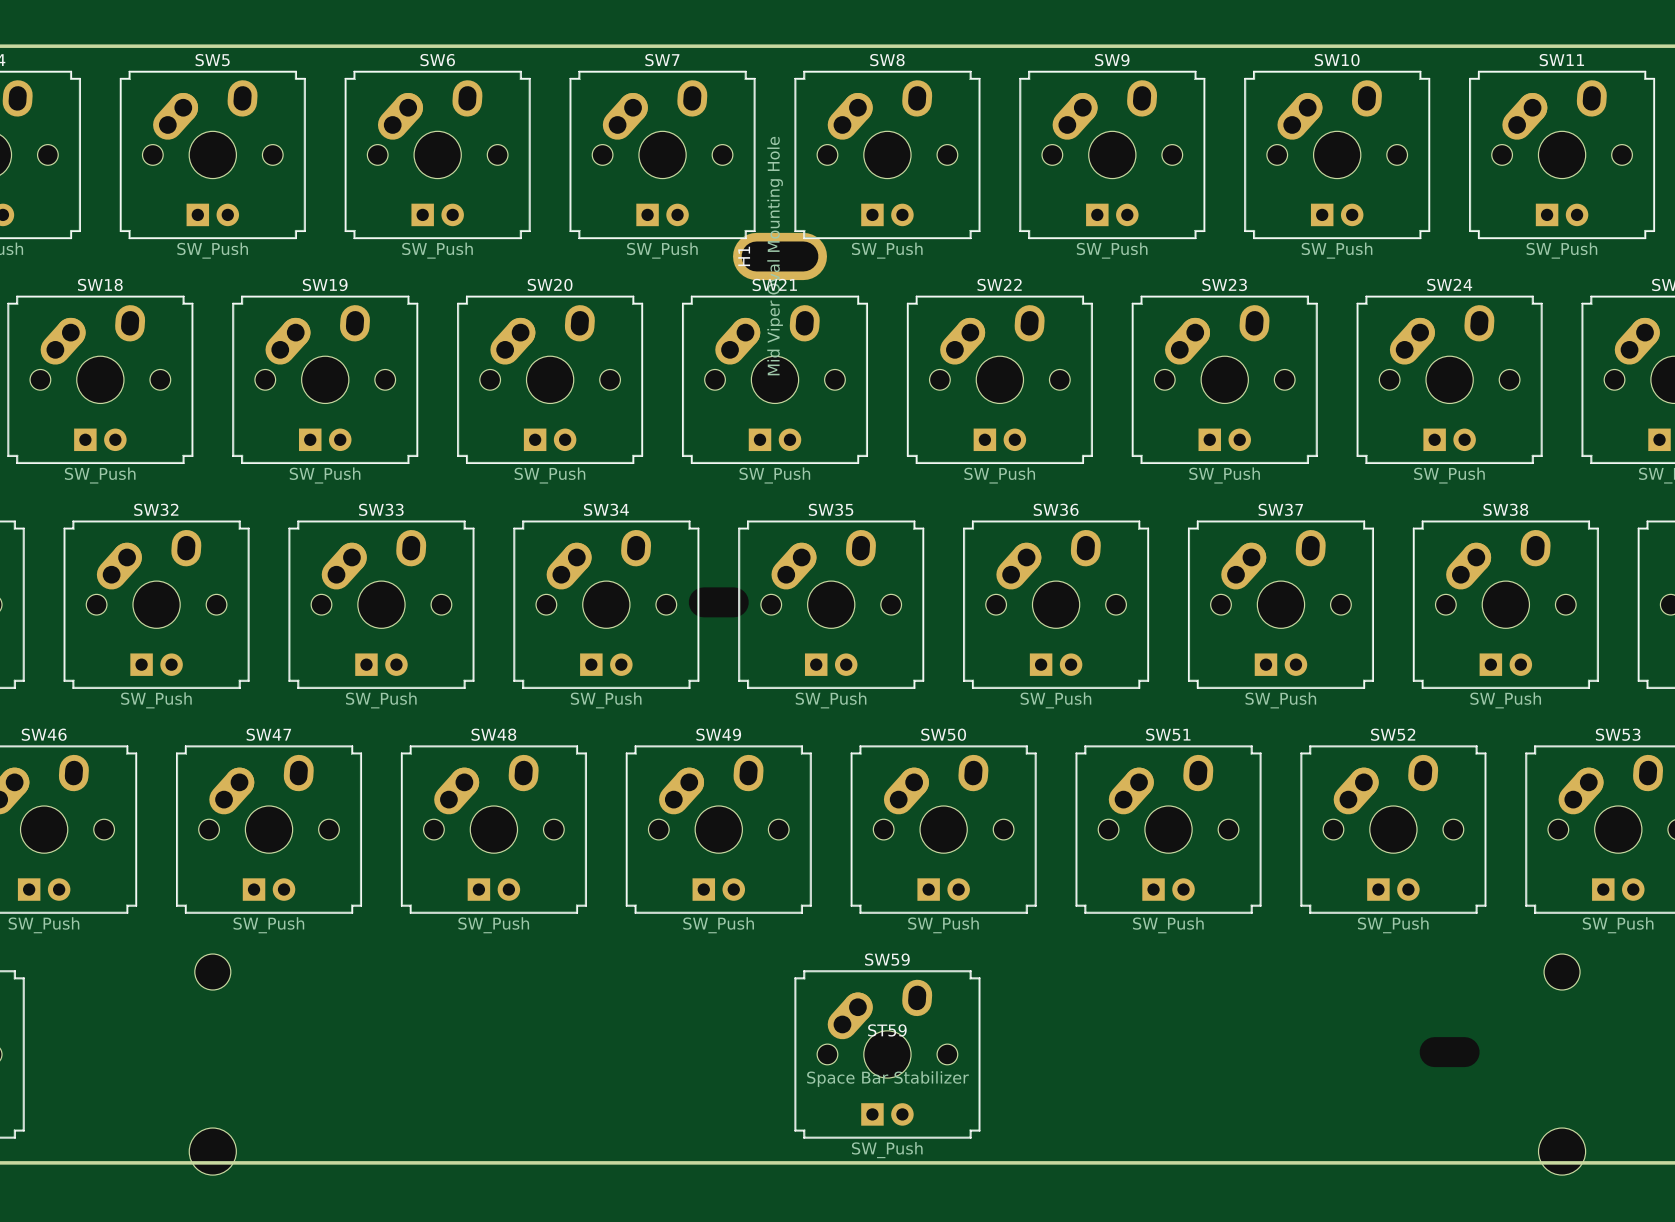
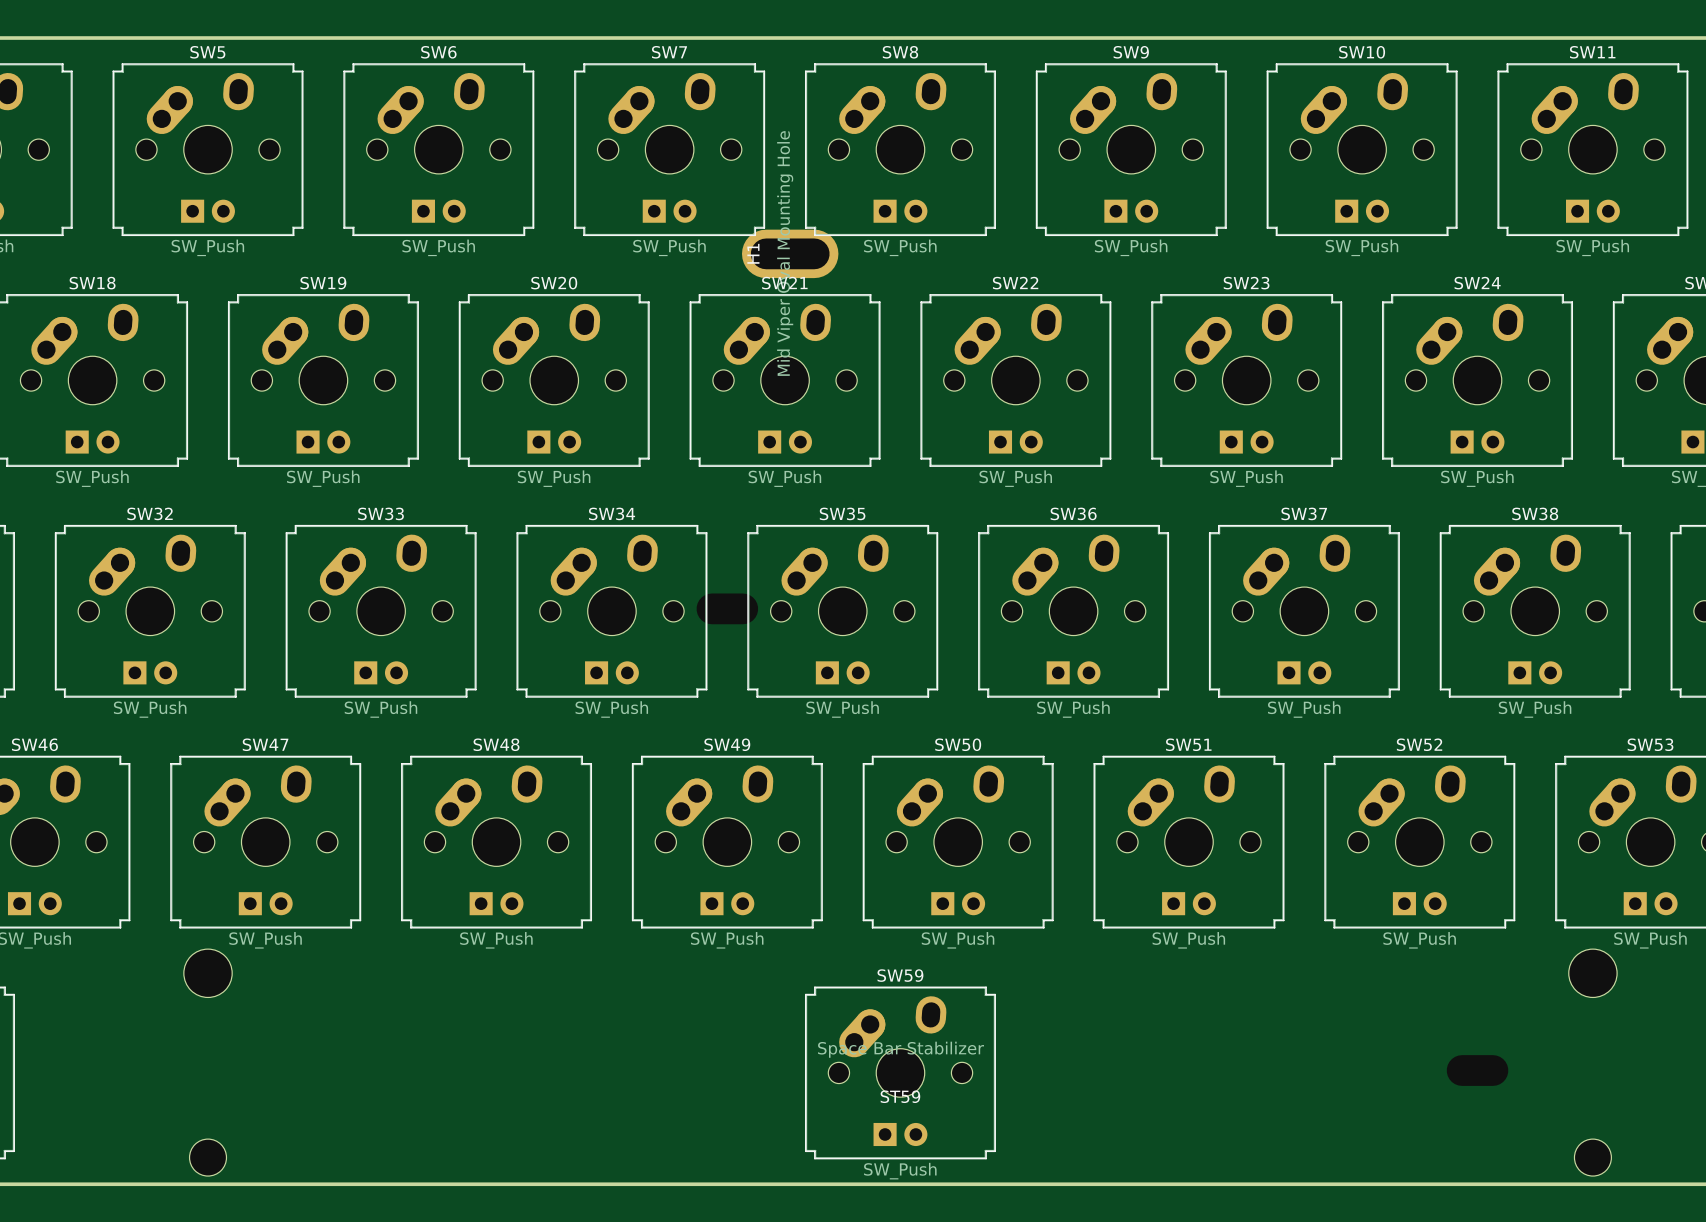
ST59 rotation: 0° (887, 1064) -> 180° (900, 1062)

